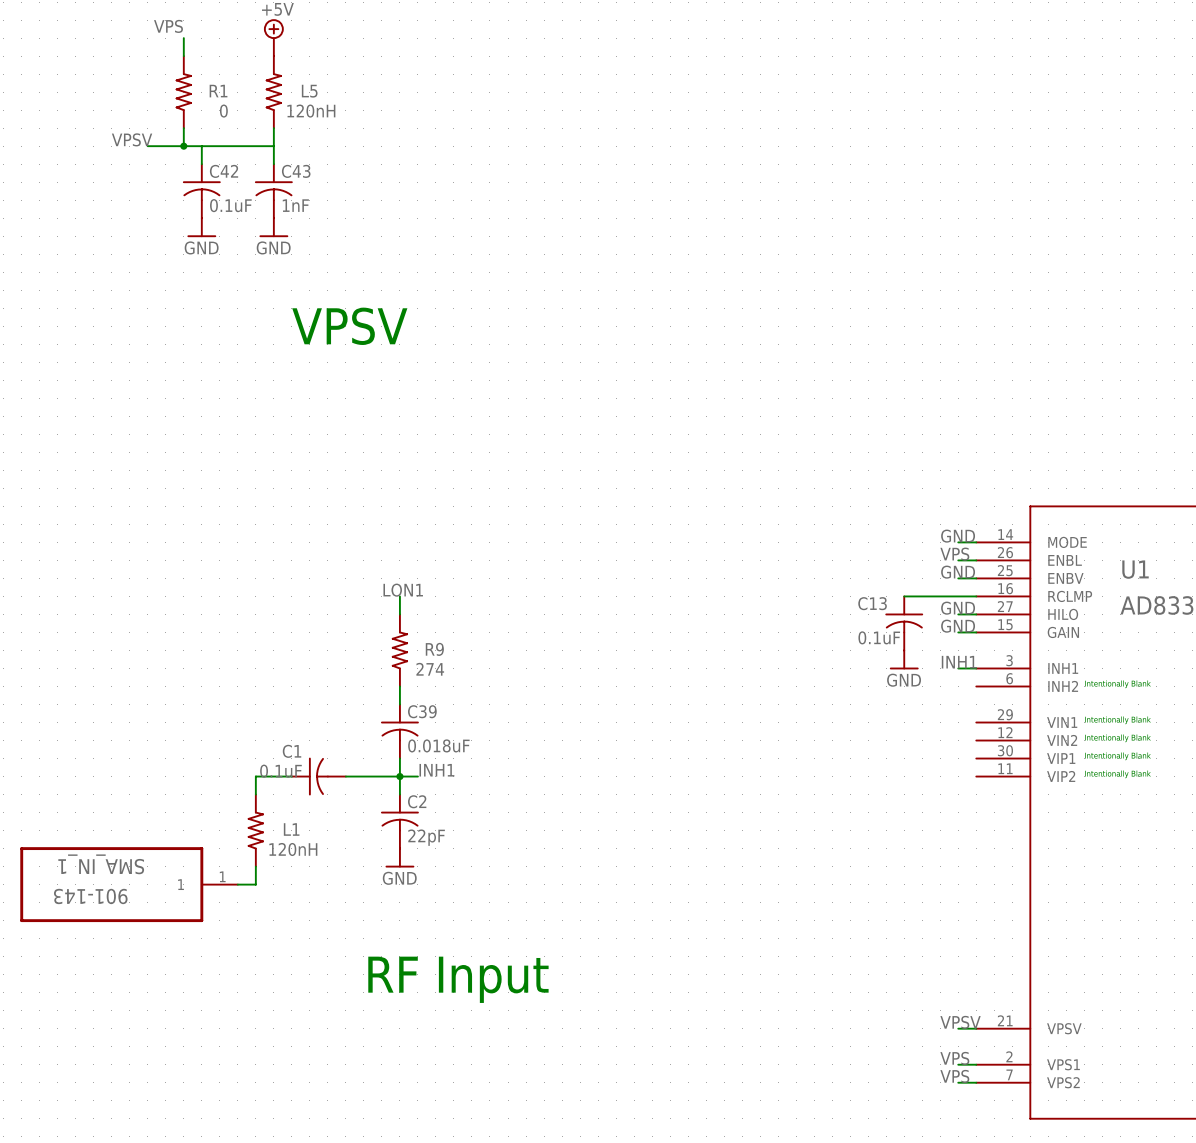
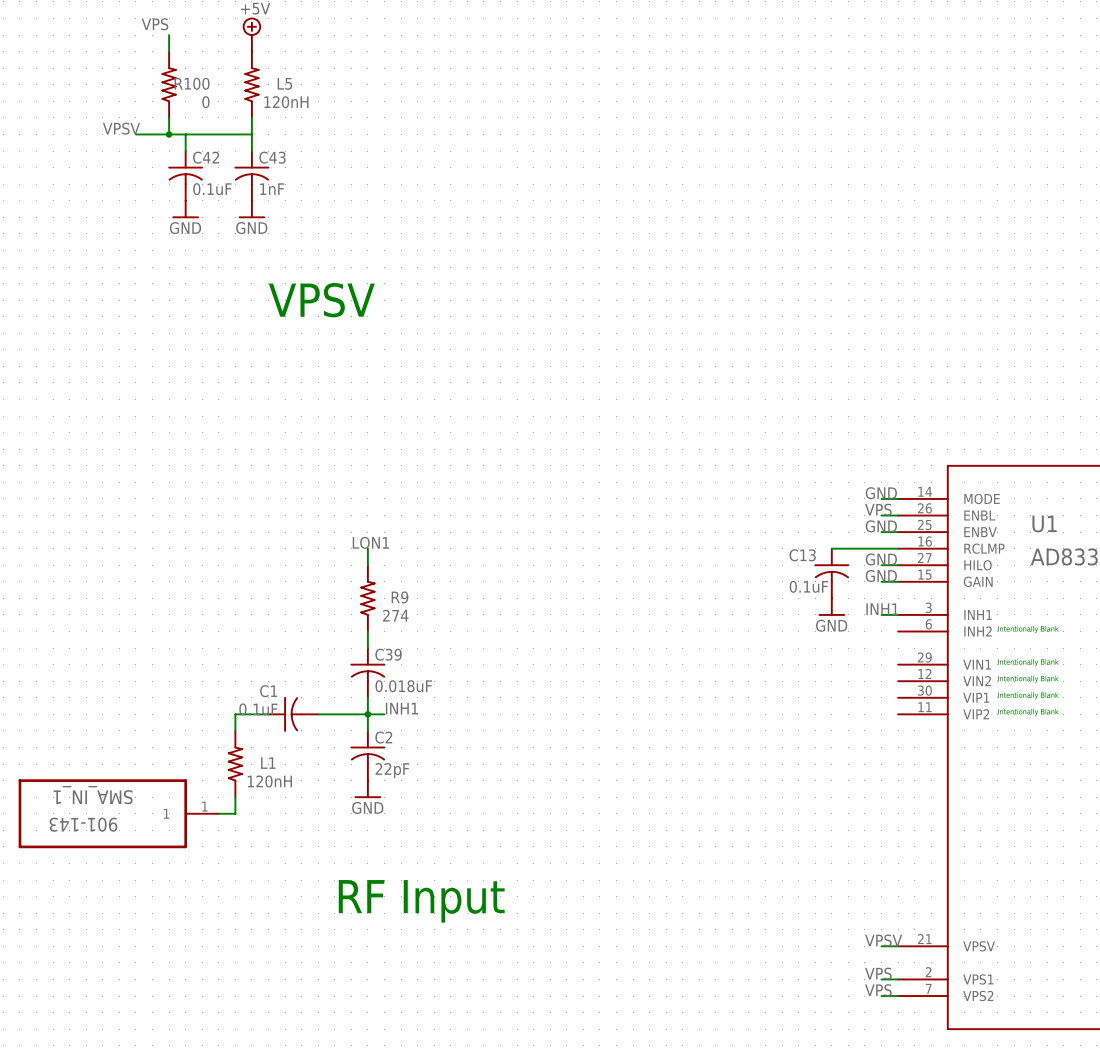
R1 name: R1 (218, 91) -> R100 (192, 83)

